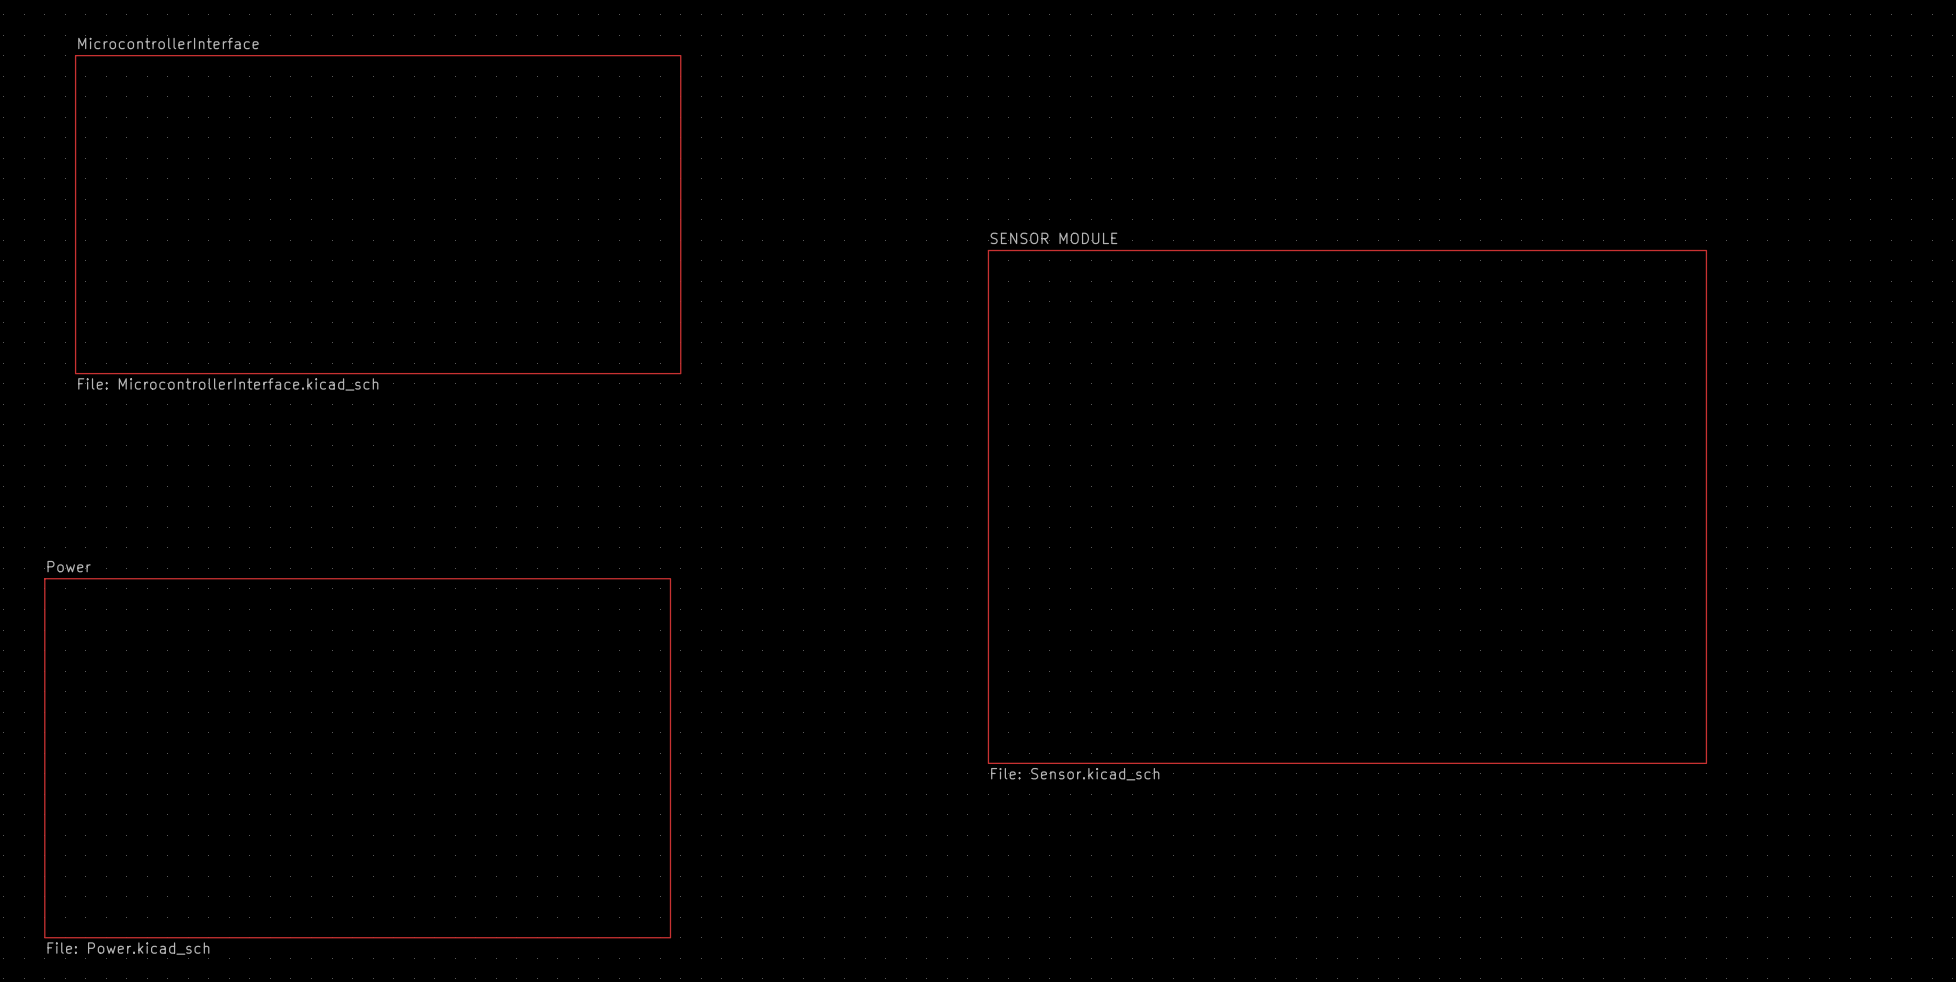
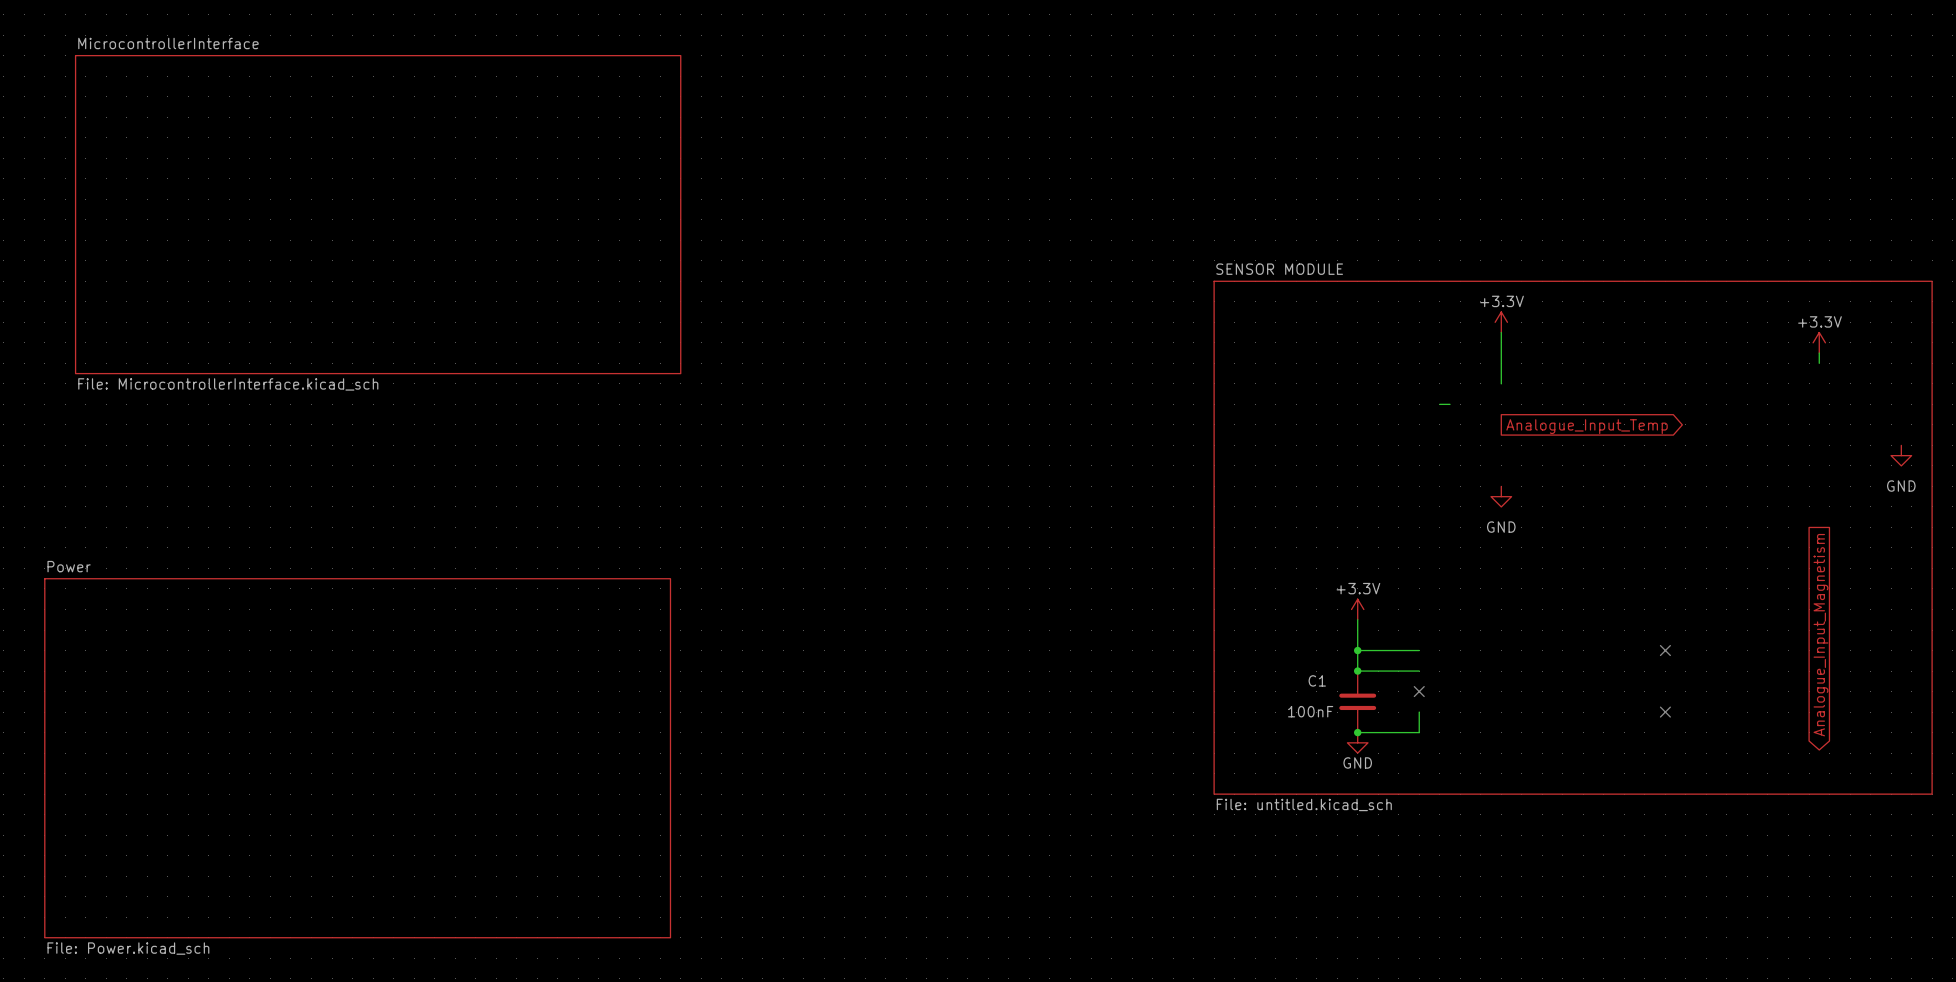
power symbol: none -> +3.3V (1501, 322)
wire: none -> (1501, 332) (1501, 383)
power symbol: none -> +3.3V (1819, 342)
wire: none -> (1819, 353) (1819, 363)
wire: none -> (1439, 404) (1450, 404)
global label: none -> Analogue_Input_Temp (1587, 426)
power symbol: none -> GND (1901, 455)
power symbol: none -> GND (1501, 496)
sheet SENSOR MODULE: File: Sensor.kicad_sch (1347, 506) -> none
sheet SENSOR MODULE: none -> File: untitled.kicad_sch (1573, 537)
power symbol: none -> +3.3V (1357, 609)
wire: none -> (1357, 619) (1357, 671) (1419, 671)
global label: none -> Analogue_Input_Magnetism (1820, 635)
wire: none -> (1357, 650) (1419, 650)
junction: none -> (1357, 650)
no-connect mark: none -> (1665, 650)
junction: none -> (1357, 671)
no-connect mark: none -> (1419, 691)
C1: none -> 100nF (1357, 701)
wire: none -> (1419, 712) (1419, 732) (1357, 732)
no-connect mark: none -> (1665, 712)
junction: none -> (1357, 732)
power symbol: none -> GND (1357, 742)

